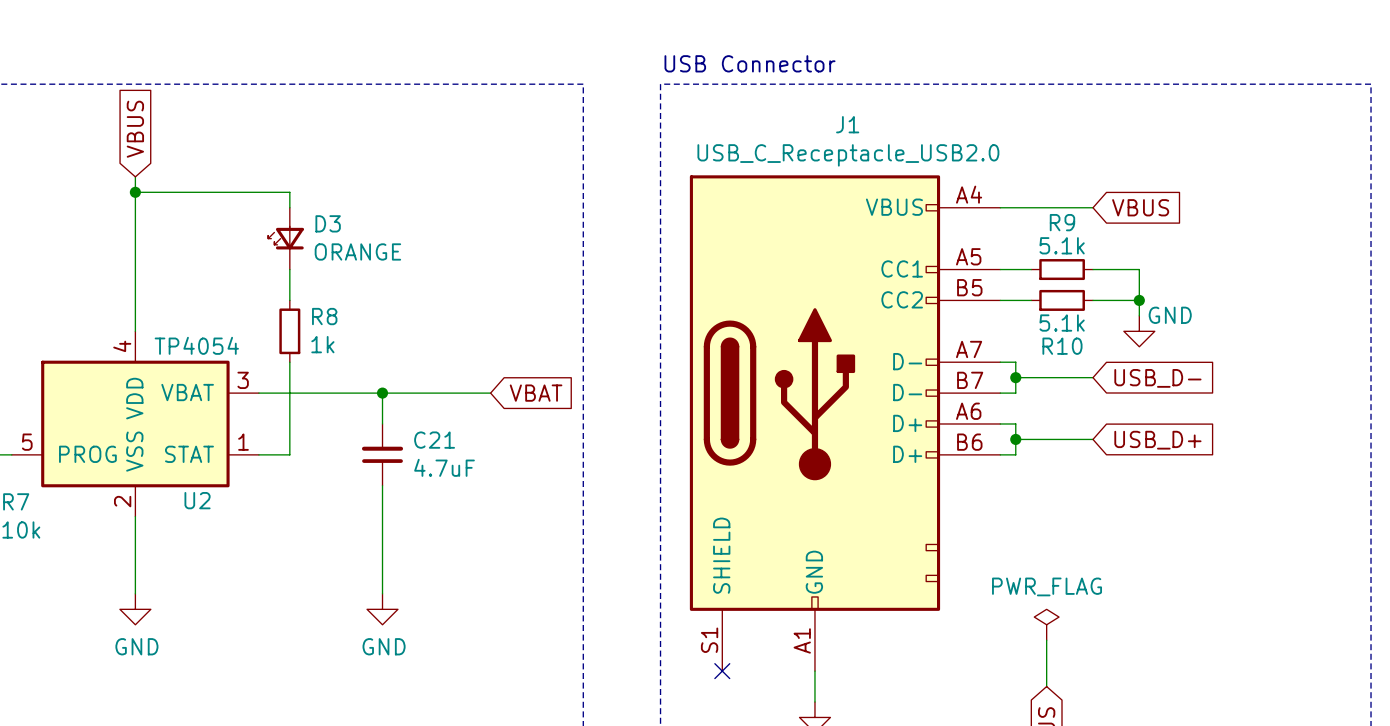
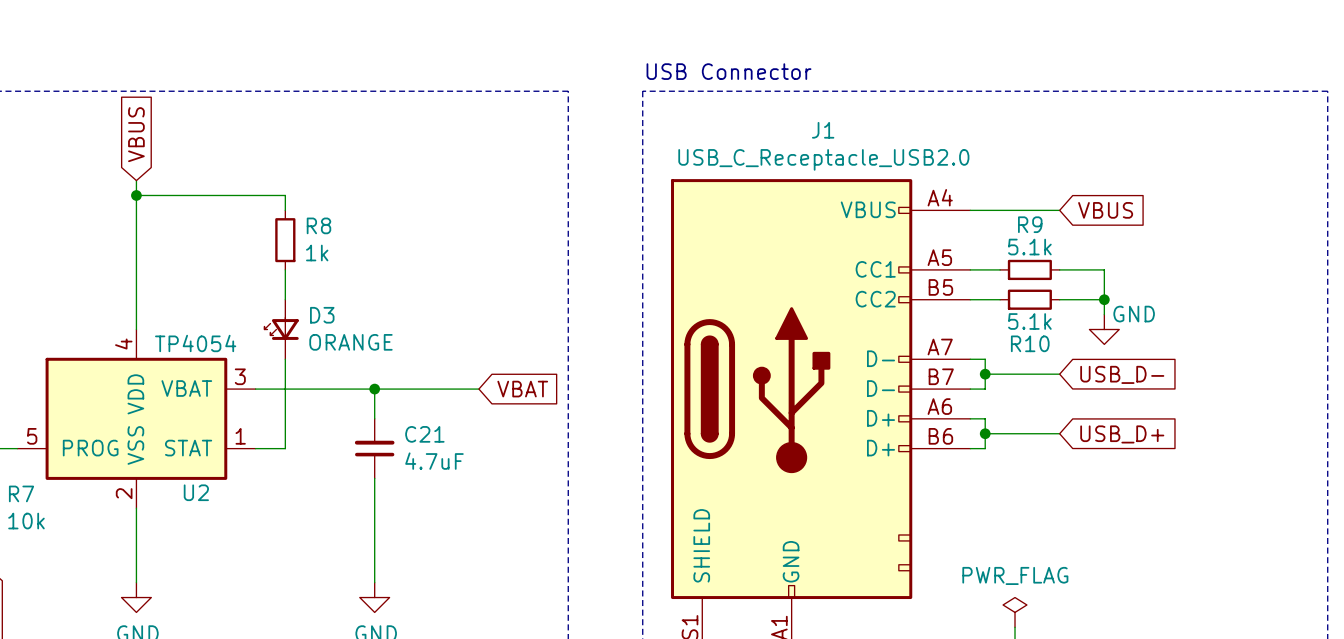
D3 position: (285, 238) -> (281, 329)
R8 position: (289, 331) -> (285, 240)

